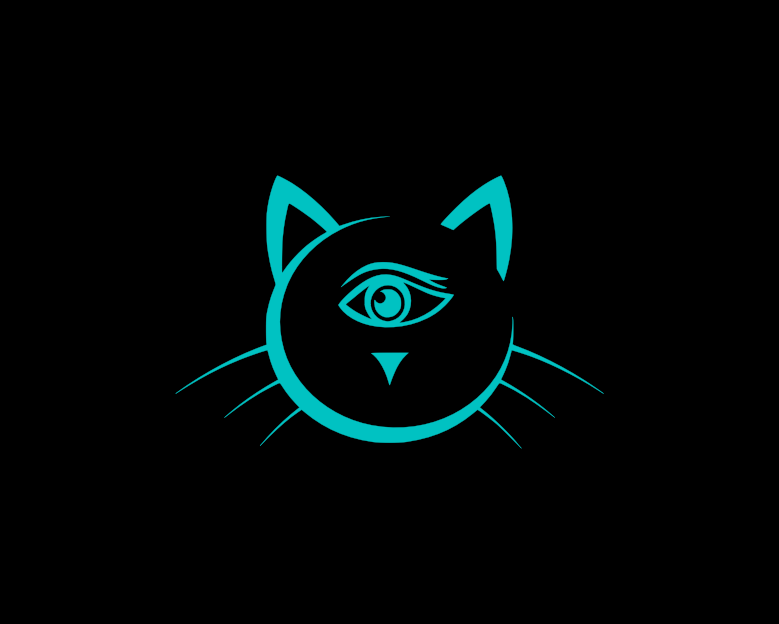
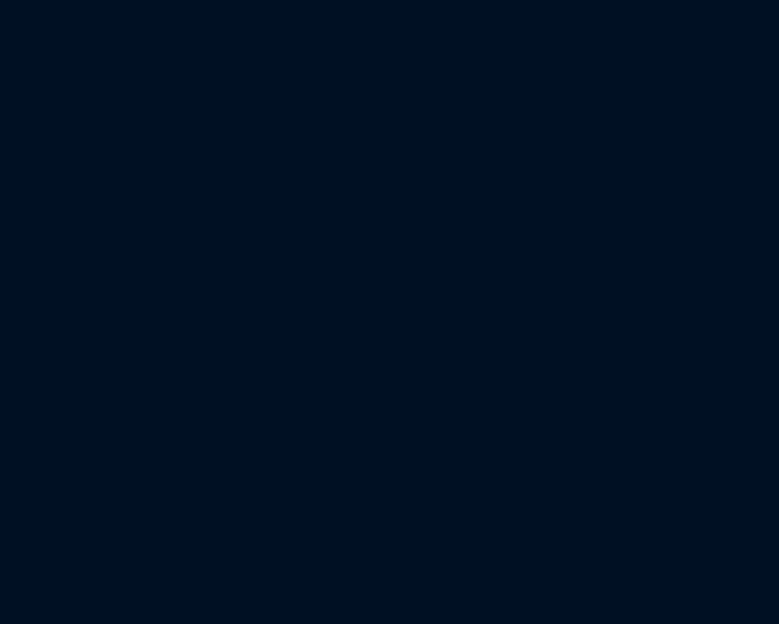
drawing: [175, 175, 604, 449] -> none

